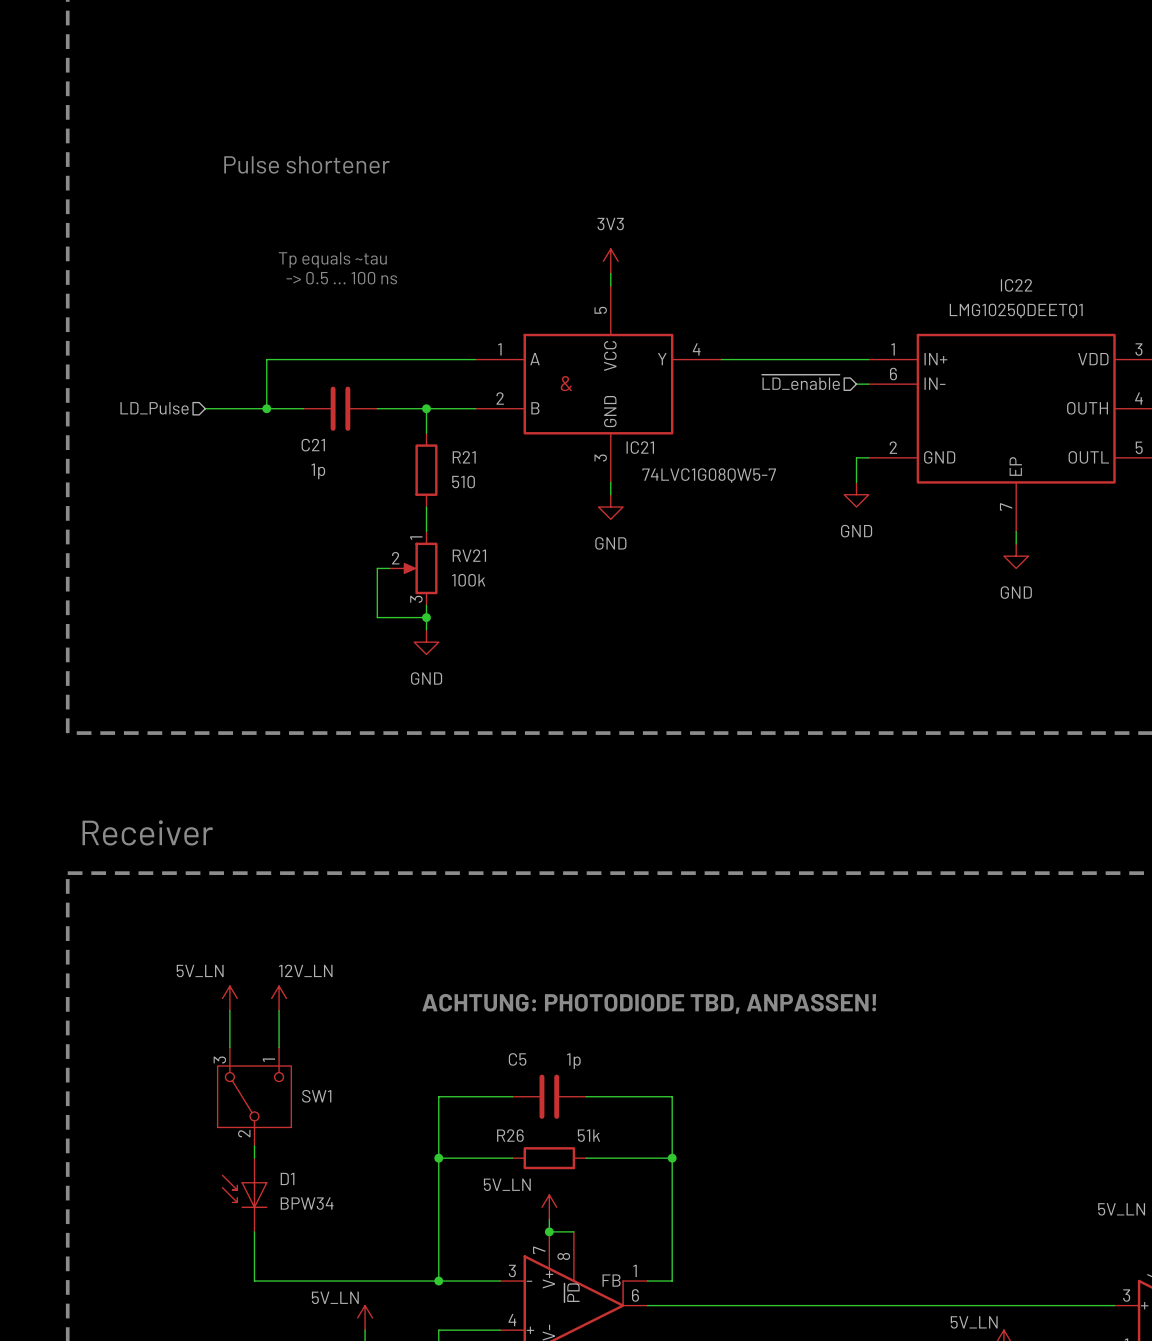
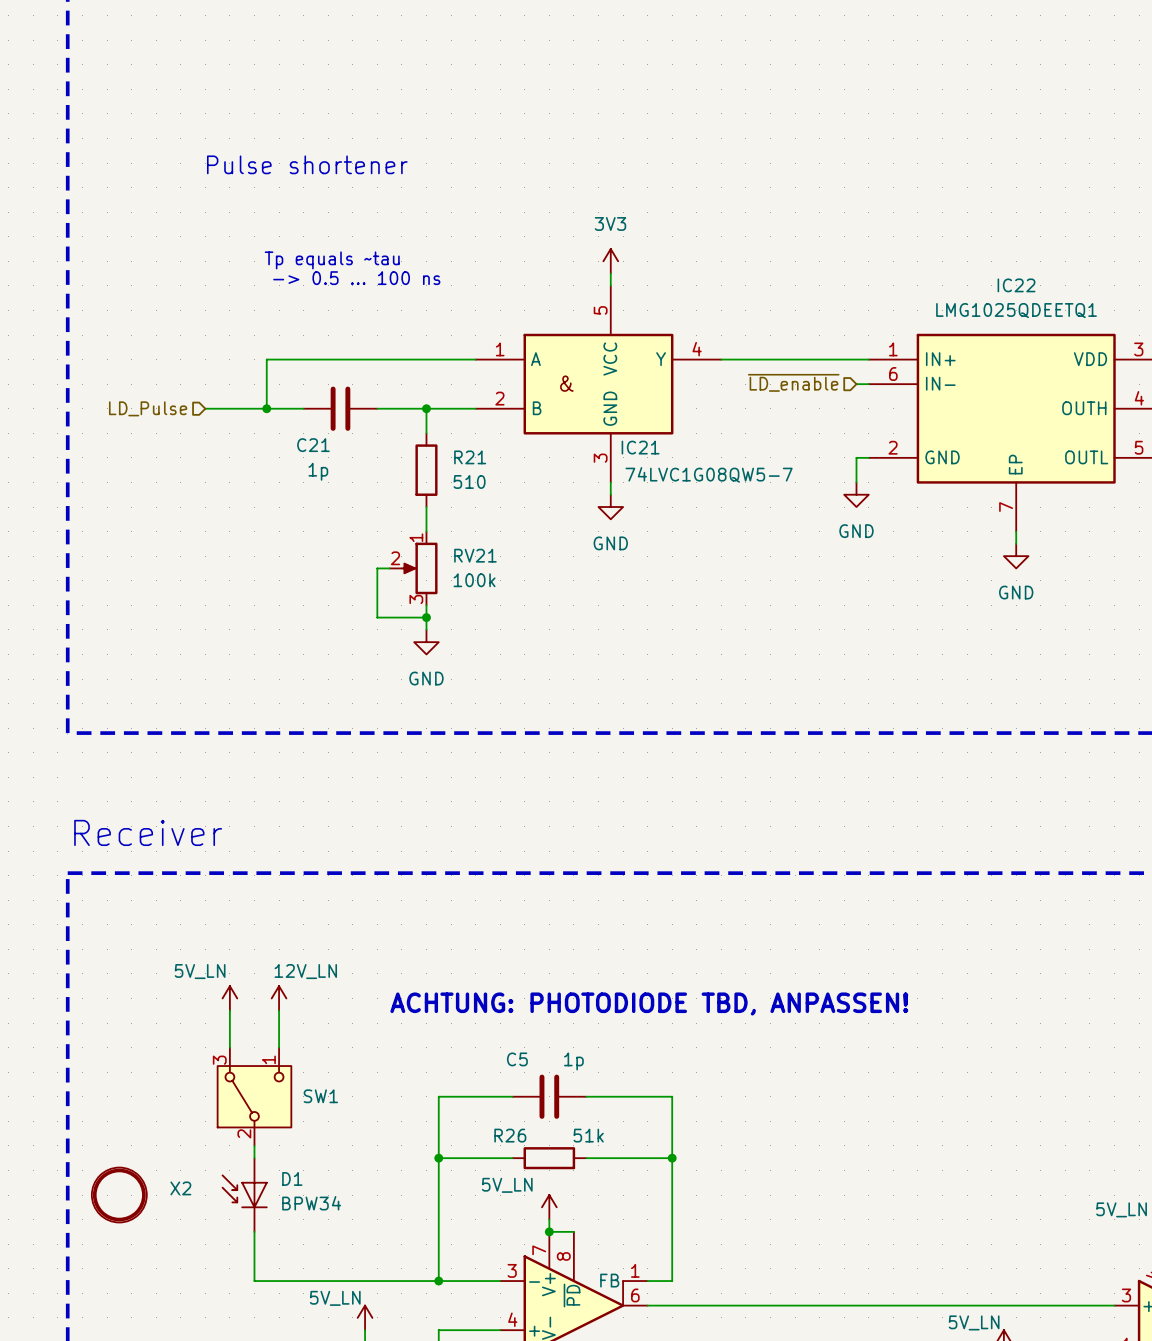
X2: none -> (119, 1195)

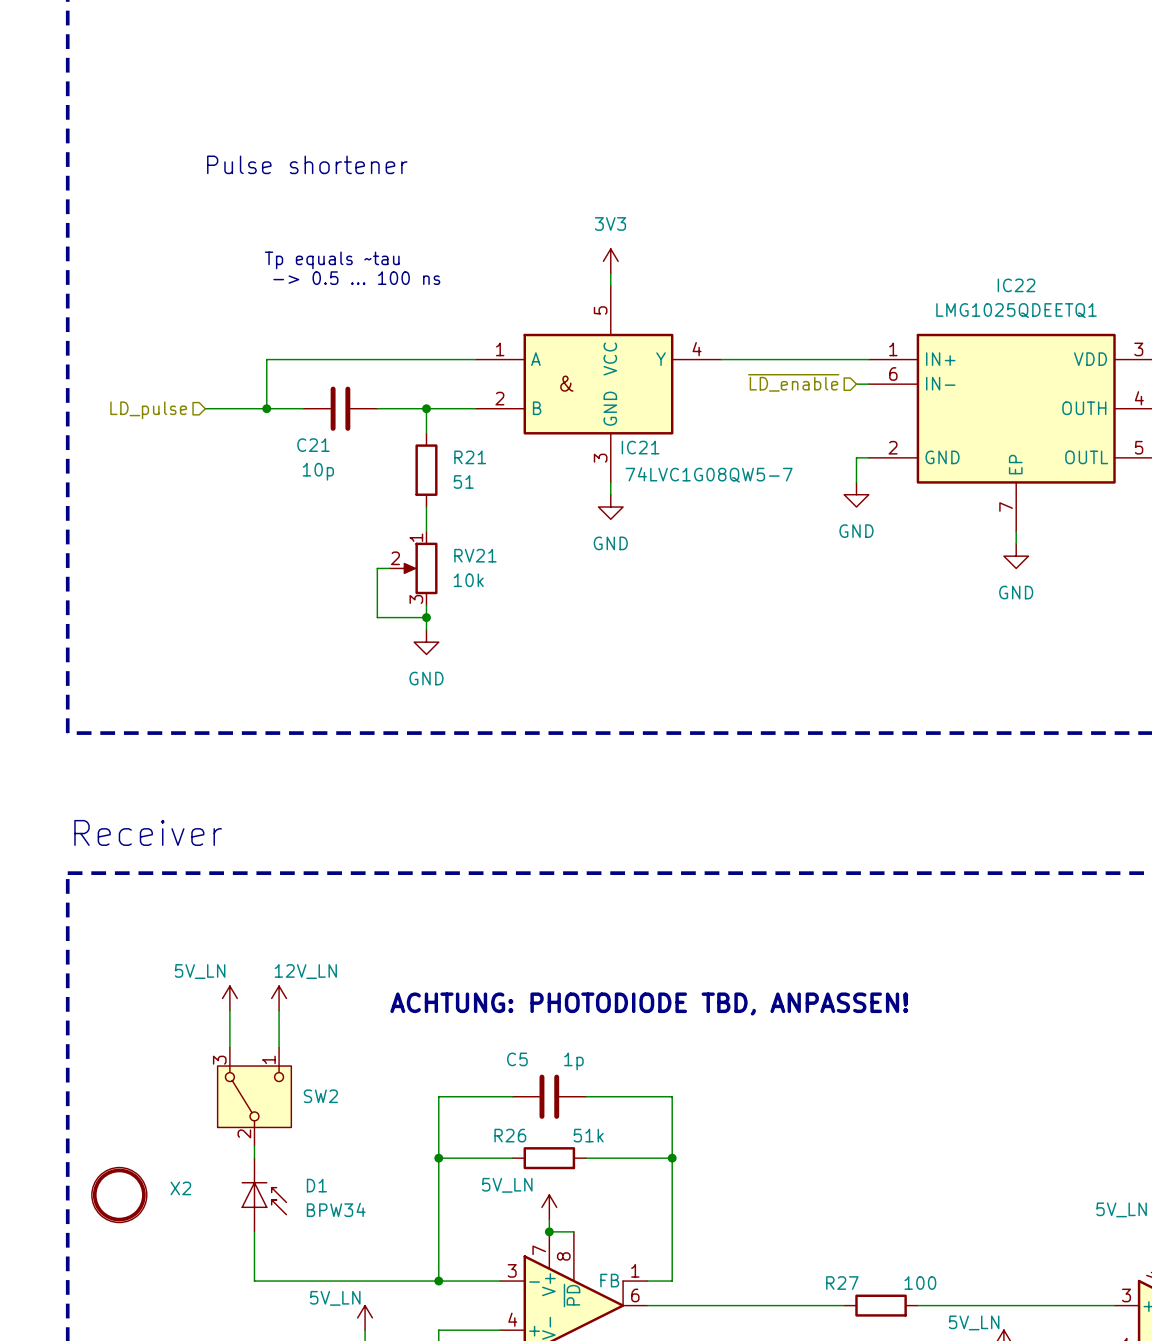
hierarchical label: LD_Pulse (148, 408) -> LD_pulse (148, 410)
C21 value: 1p (318, 471) -> 10p (318, 471)
R21 value: 510 (469, 481) -> 51 (463, 481)
RV21 value: 100k (474, 580) -> 10k (468, 580)
SW1 name: SW1 (320, 1096) -> SW2 (320, 1096)
D1 rotation: 0° (245, 1191) -> 180° (263, 1198)
wire: (844, 1305) (917, 1305) -> none
R27: none -> 100 (881, 1305)

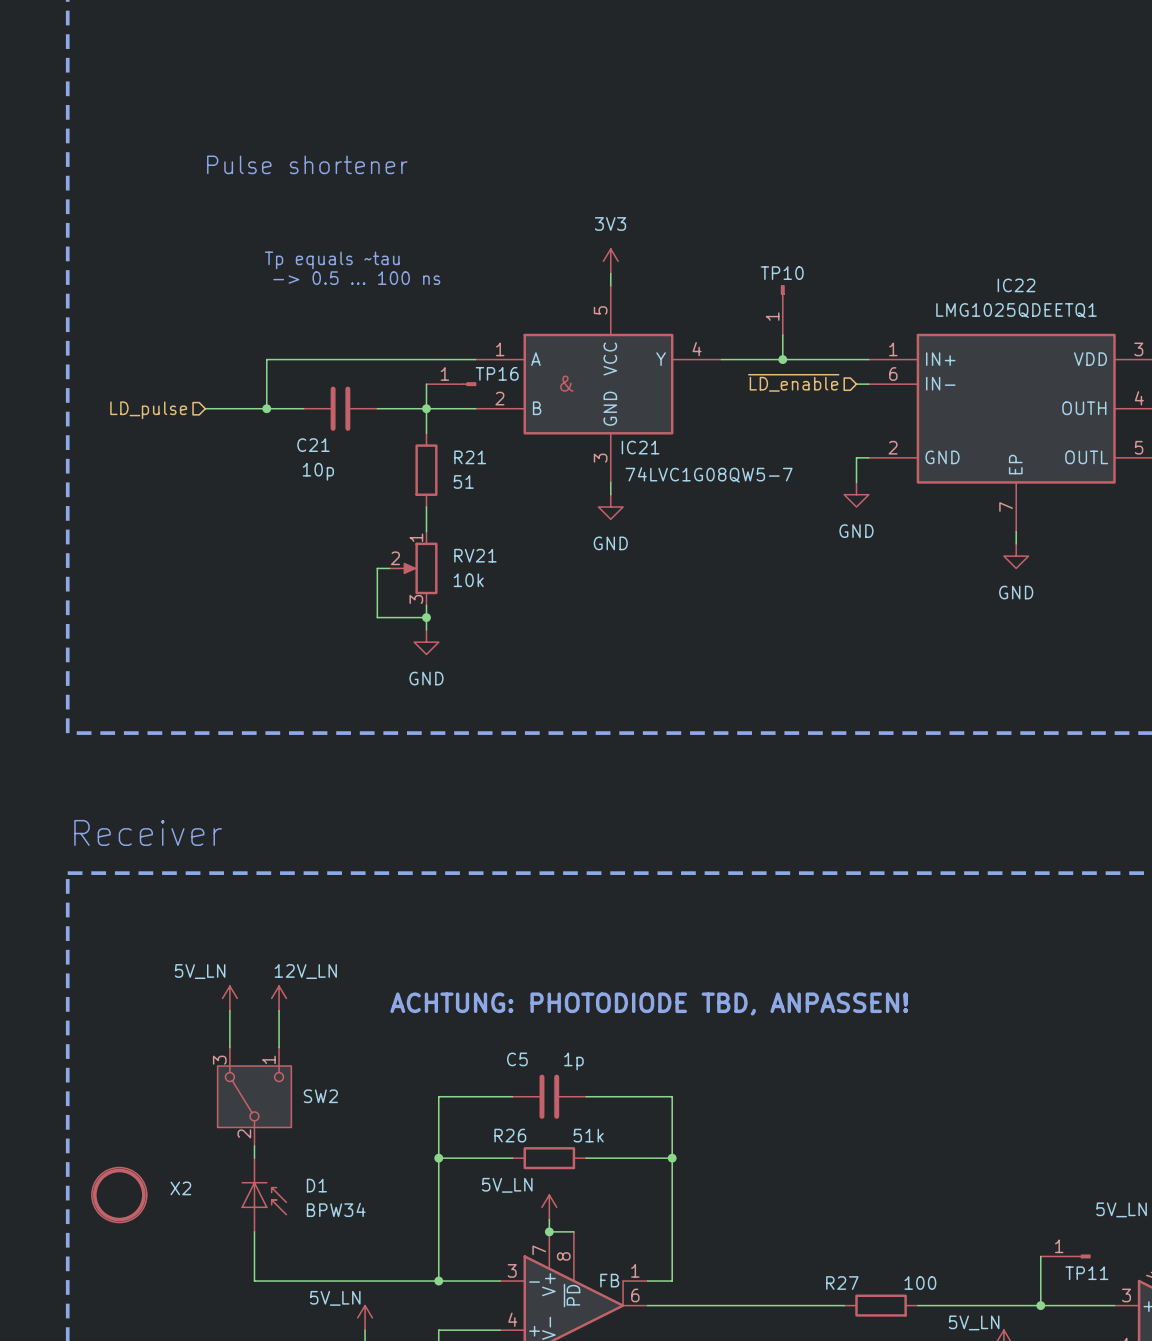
TP10: none -> (782, 310)
wire: none -> (782, 335) (782, 359)
junction: none -> (782, 359)
wire: none -> (426, 384) (426, 408)
TP16: none -> (451, 384)
wire: none -> (1040, 1256) (1040, 1305)
TP11: none -> (1065, 1256)
junction: none -> (1040, 1305)

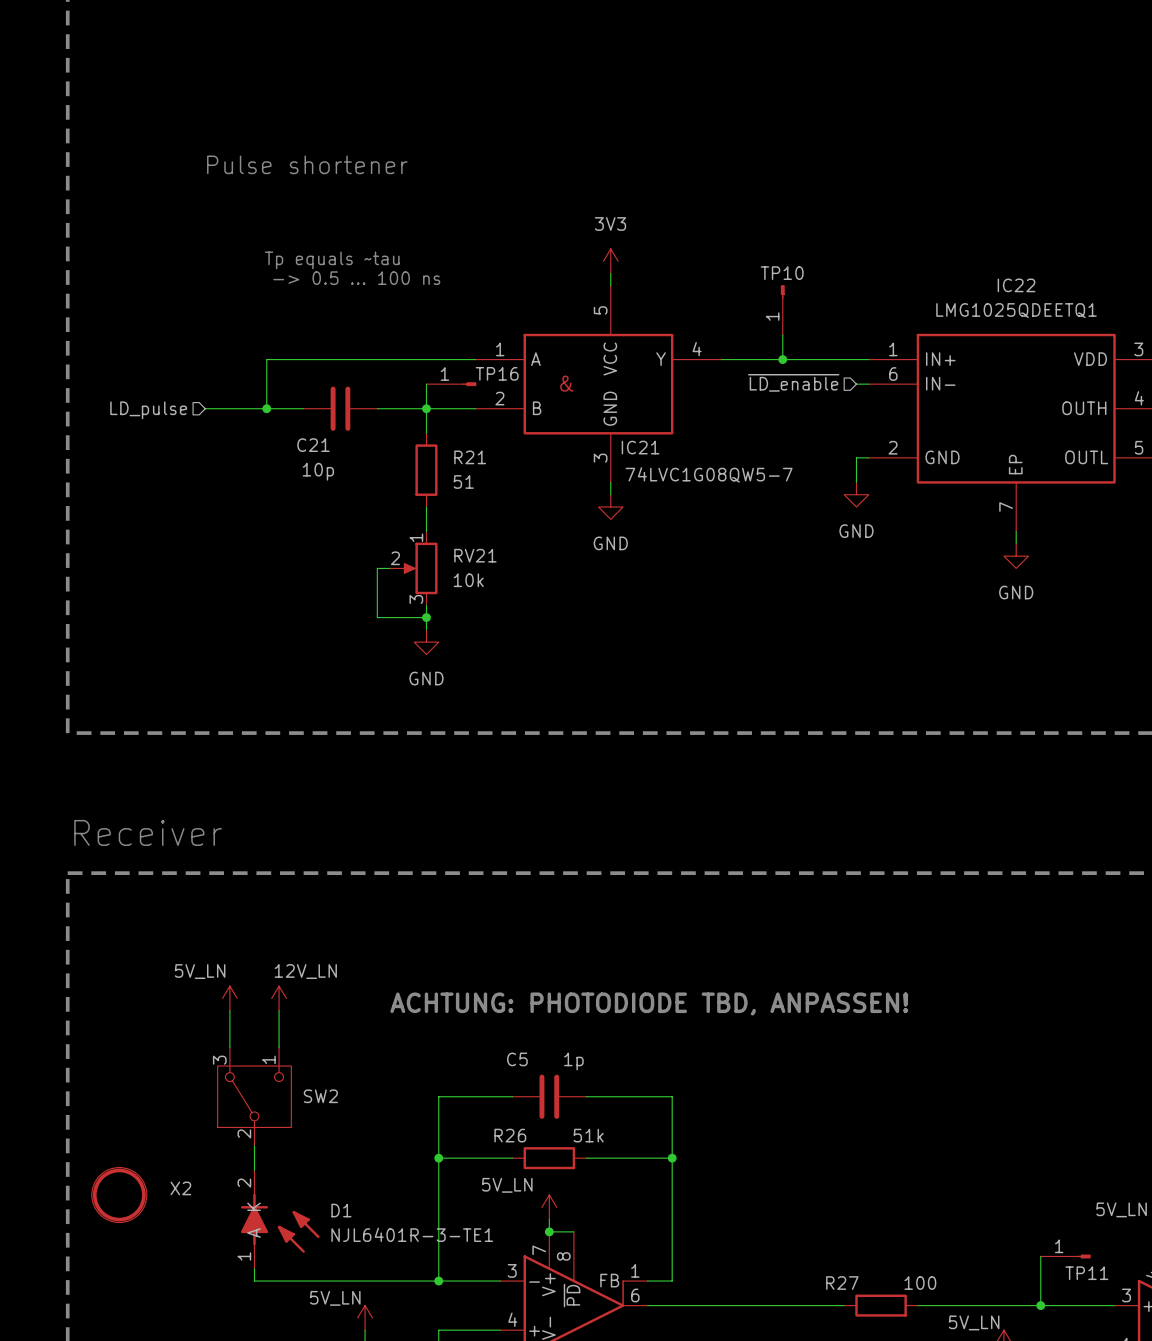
D1 symbol: [241, 1158, 287, 1232] -> [240, 1170, 320, 1269]
D1 value: BPW34 (336, 1209) -> NJL6401R-3-TE1 (412, 1234)

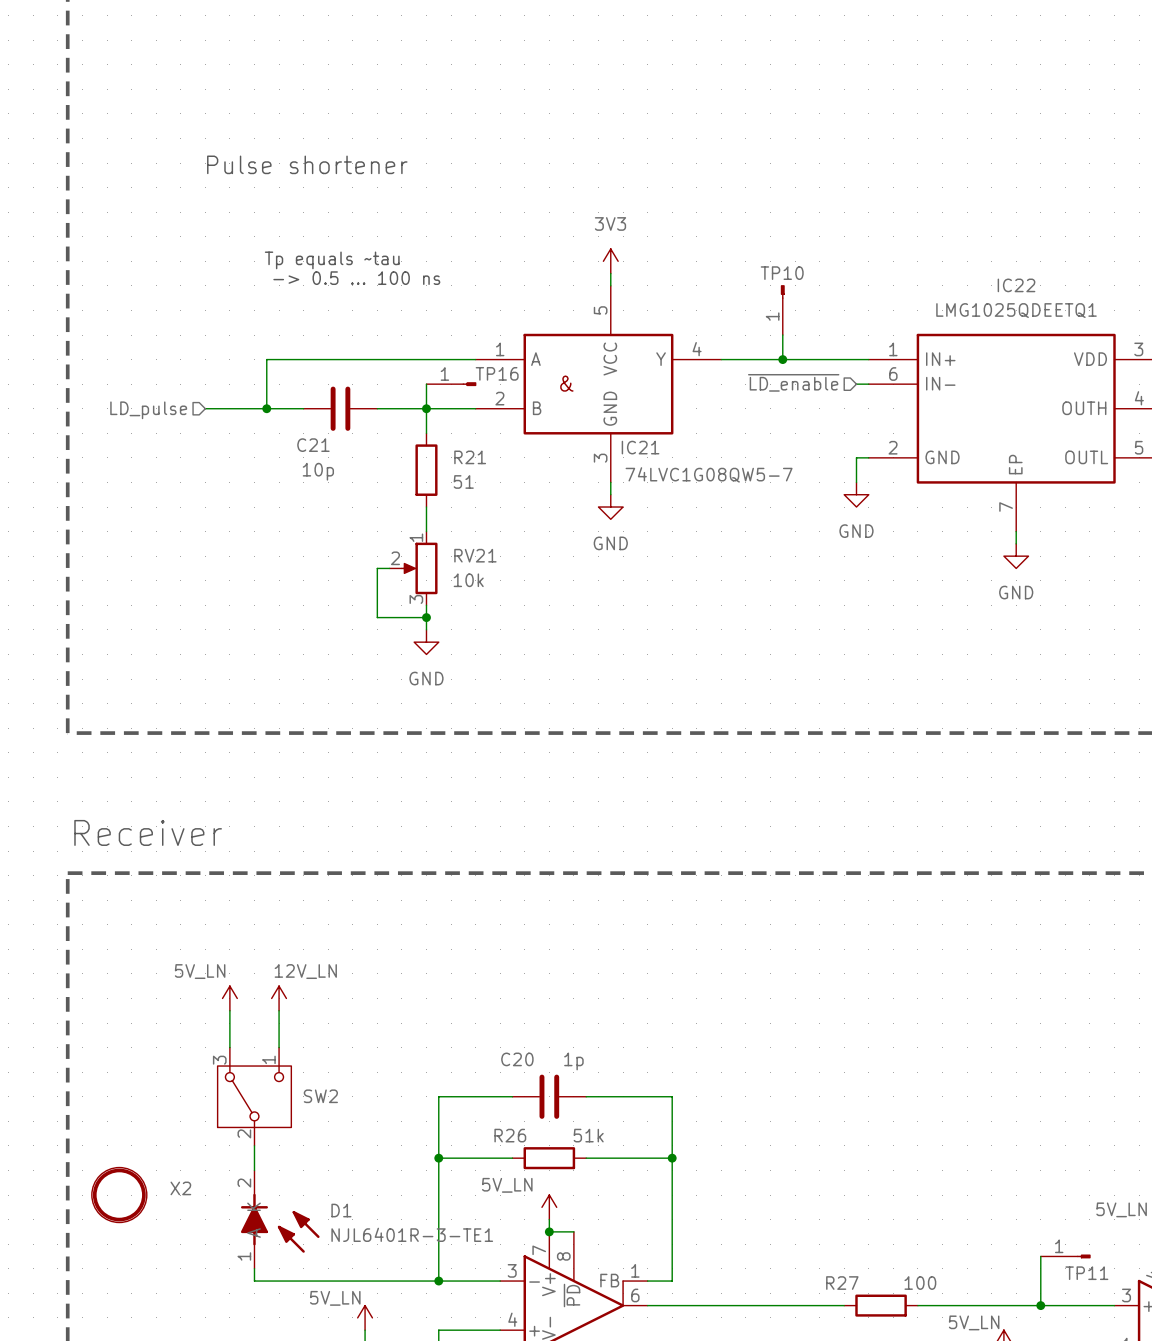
text: ACHTUNG: PHOTODIODE TBD, ANPASSEN! (649, 1003) -> none
C5 name: C5 (517, 1059) -> C20 (517, 1059)

